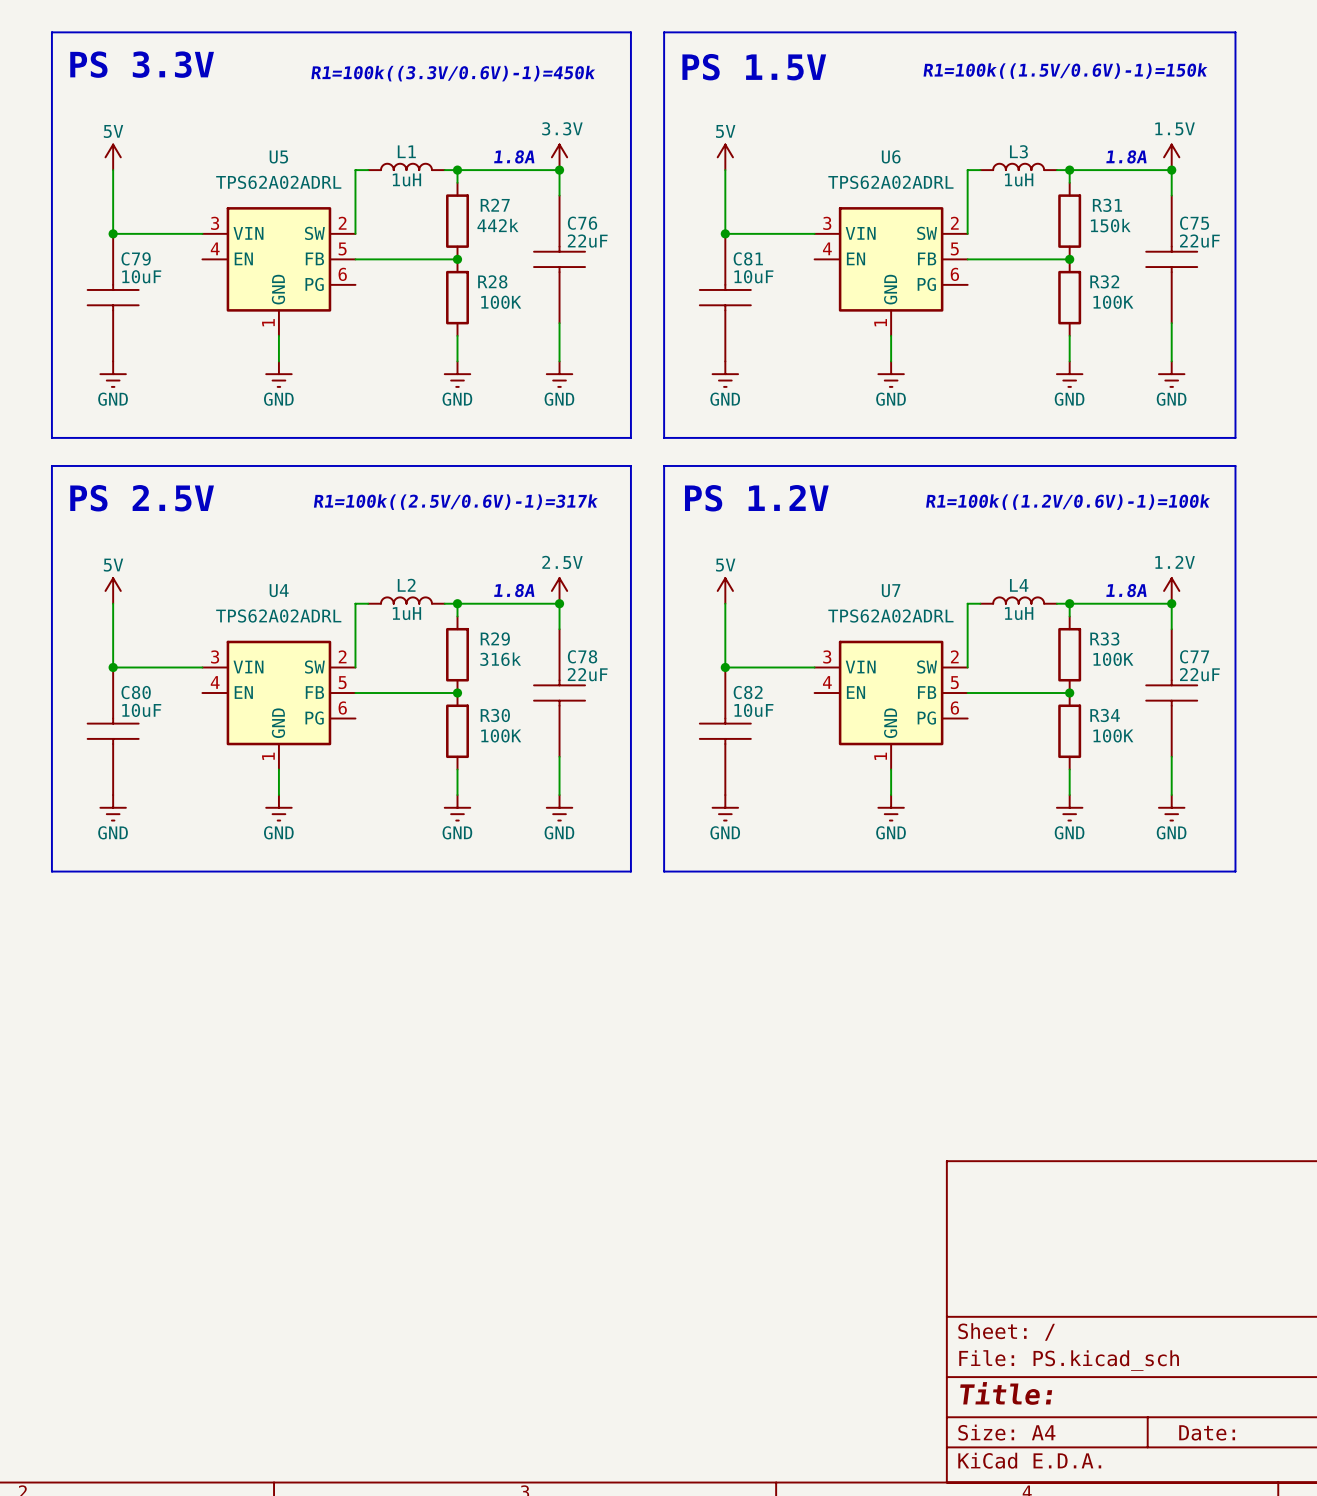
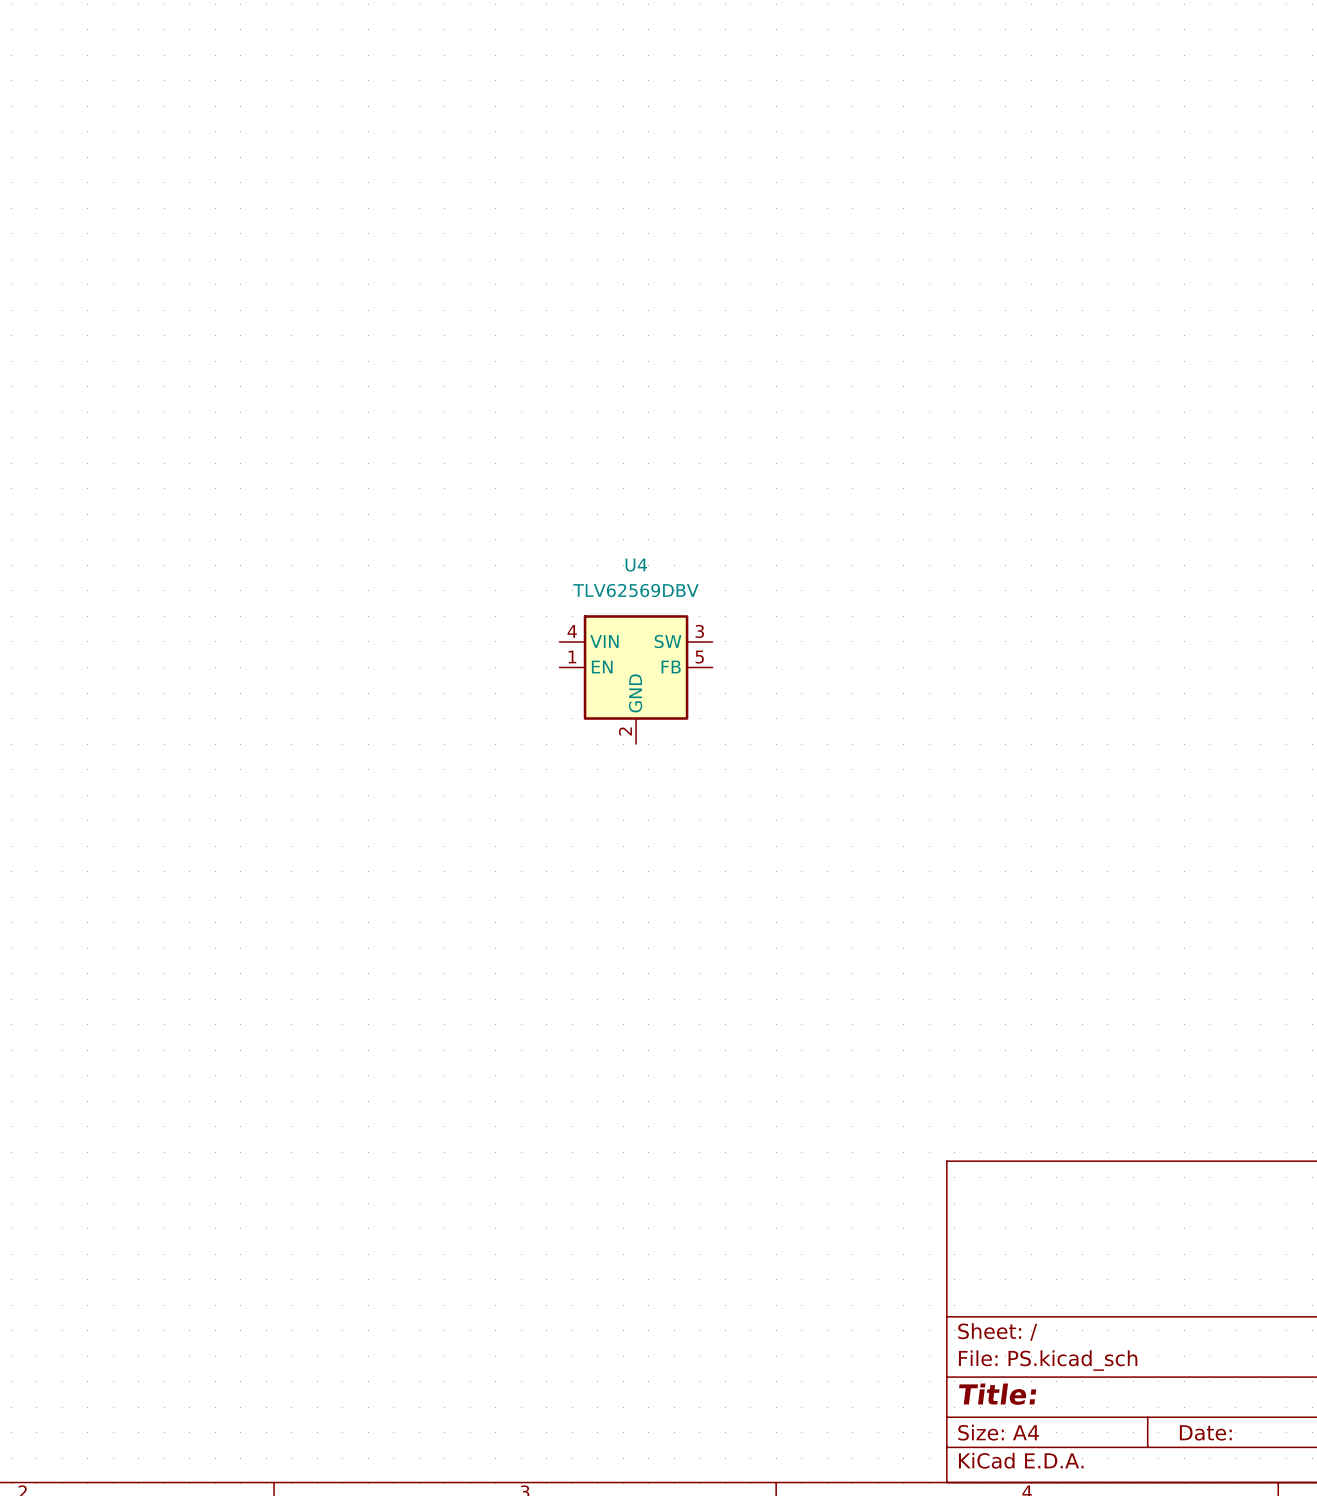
line: (51, 32) (51, 437) (630, 437) (630, 32) (51, 32) -> none
line: (664, 32) (1235, 32) (1235, 437) (664, 437) (664, 32) -> none
text: PS 3.3V (142, 64) -> none
text: PS 1.5V (754, 67) -> none
text: R1=100k((1.5V/0.6V)-1)=150k (1065, 71) -> none
text: R1=100k((3.3V/0.6V)-1)=450k (453, 73) -> none
text: 1.8A (514, 156) -> none
text: 1.8A (1126, 156) -> none
power symbol: 5V (113, 157) -> none
power symbol: 3.3V (559, 157) -> none
power symbol: 5V (725, 157) -> none
power symbol: 1.5V (1171, 157) -> none
L1: 1uH (406, 166) -> none
L3: 1uH (1018, 166) -> none
wire: (113, 170) (113, 233) (202, 233) -> none
wire: (368, 170) (355, 170) (355, 233) -> none
wire: (444, 170) (559, 170) (559, 195) -> none
wire: (457, 170) (457, 182) -> none
junction: (457, 170) -> none
junction: (559, 170) -> none
wire: (725, 170) (725, 233) (814, 233) -> none
wire: (980, 170) (967, 170) (967, 233) -> none
wire: (1056, 170) (1171, 170) (1171, 195) -> none
wire: (1069, 170) (1069, 182) -> none
junction: (1069, 170) -> none
junction: (1171, 170) -> none
R27: 442k (457, 221) -> none
R31: 150k (1069, 221) -> none
junction: (113, 233) -> none
junction: (725, 233) -> none
wire: (355, 259) (457, 259) -> none
junction: (457, 259) -> none
C76: 22uF (559, 259) -> none
wire: (967, 259) (1069, 259) -> none
junction: (1069, 259) -> none
C75: 22uF (1171, 259) -> none
U5: TPS62A02ADRL (278, 271) -> none
U6: TPS62A02ADRL (891, 271) -> none
C79: 10uF (113, 297) -> none
R28: 100K (457, 297) -> none
C81: 10uF (725, 297) -> none
R32: 100K (1069, 297) -> none
wire: (559, 323) (559, 361) -> none
wire: (1171, 323) (1171, 361) -> none
wire: (278, 335) (278, 361) -> none
wire: (457, 335) (457, 361) -> none
wire: (891, 335) (891, 361) -> none
wire: (1069, 335) (1069, 361) -> none
power symbol: GND (113, 374) -> none
power symbol: GND (278, 374) -> none
power symbol: GND (457, 374) -> none
power symbol: GND (559, 374) -> none
power symbol: GND (725, 374) -> none
power symbol: GND (891, 374) -> none
power symbol: GND (1069, 374) -> none
power symbol: GND (1171, 374) -> none
line: (51, 465) (630, 465) (630, 871) (51, 871) (51, 465) -> none
line: (664, 465) (1235, 465) (1235, 871) (664, 871) (664, 465) -> none
text: PS 2.5V (142, 498) -> none
text: PS 1.2V (756, 498) -> none
text: R1=100k((2.5V/0.6V)-1)=317k (455, 502) -> none
text: R1=100k((1.2V/0.6V)-1)=100k (1068, 502) -> none
power symbol: 5V (113, 590) -> none
text: 1.8A (514, 590) -> none
power symbol: 2.5V (559, 590) -> none
power symbol: 5V (725, 590) -> none
text: 1.8A (1126, 590) -> none
power symbol: 1.2V (1171, 590) -> none
L2: 1uH (406, 600) -> none
L4: 1uH (1018, 600) -> none
wire: (113, 603) (113, 667) (202, 667) -> none
wire: (368, 603) (355, 603) (355, 667) -> none
wire: (444, 603) (559, 603) (559, 629) -> none
wire: (457, 603) (457, 616) -> none
junction: (457, 603) -> none
junction: (559, 603) -> none
wire: (725, 603) (725, 667) (814, 667) -> none
wire: (980, 603) (967, 603) (967, 667) -> none
wire: (1056, 603) (1171, 603) (1171, 629) -> none
wire: (1069, 603) (1069, 616) -> none
junction: (1069, 603) -> none
junction: (1171, 603) -> none
U4 value: TPS62A02ADRL (278, 616) -> TLV62569DBV (635, 590)
U4 symbol: [202, 640, 356, 770] -> [559, 615, 713, 745]
R29: 316k (457, 654) -> none
R33: 100K (1069, 654) -> none
junction: (113, 667) -> none
junction: (725, 667) -> none
wire: (355, 693) (457, 693) -> none
junction: (457, 693) -> none
C78: 22uF (559, 693) -> none
wire: (967, 693) (1069, 693) -> none
junction: (1069, 693) -> none
C77: 22uF (1171, 693) -> none
U7: TPS62A02ADRL (891, 705) -> none
C80: 10uF (113, 731) -> none
R30: 100K (457, 731) -> none
C82: 10uF (725, 731) -> none
R34: 100K (1069, 731) -> none
wire: (559, 756) (559, 795) -> none
wire: (1171, 756) (1171, 795) -> none
wire: (278, 769) (278, 795) -> none
wire: (457, 769) (457, 795) -> none
wire: (891, 769) (891, 795) -> none
wire: (1069, 769) (1069, 795) -> none
power symbol: GND (113, 807) -> none
power symbol: GND (278, 807) -> none
power symbol: GND (457, 807) -> none
power symbol: GND (559, 807) -> none
power symbol: GND (725, 807) -> none
power symbol: GND (891, 807) -> none
power symbol: GND (1069, 807) -> none
power symbol: GND (1171, 807) -> none

